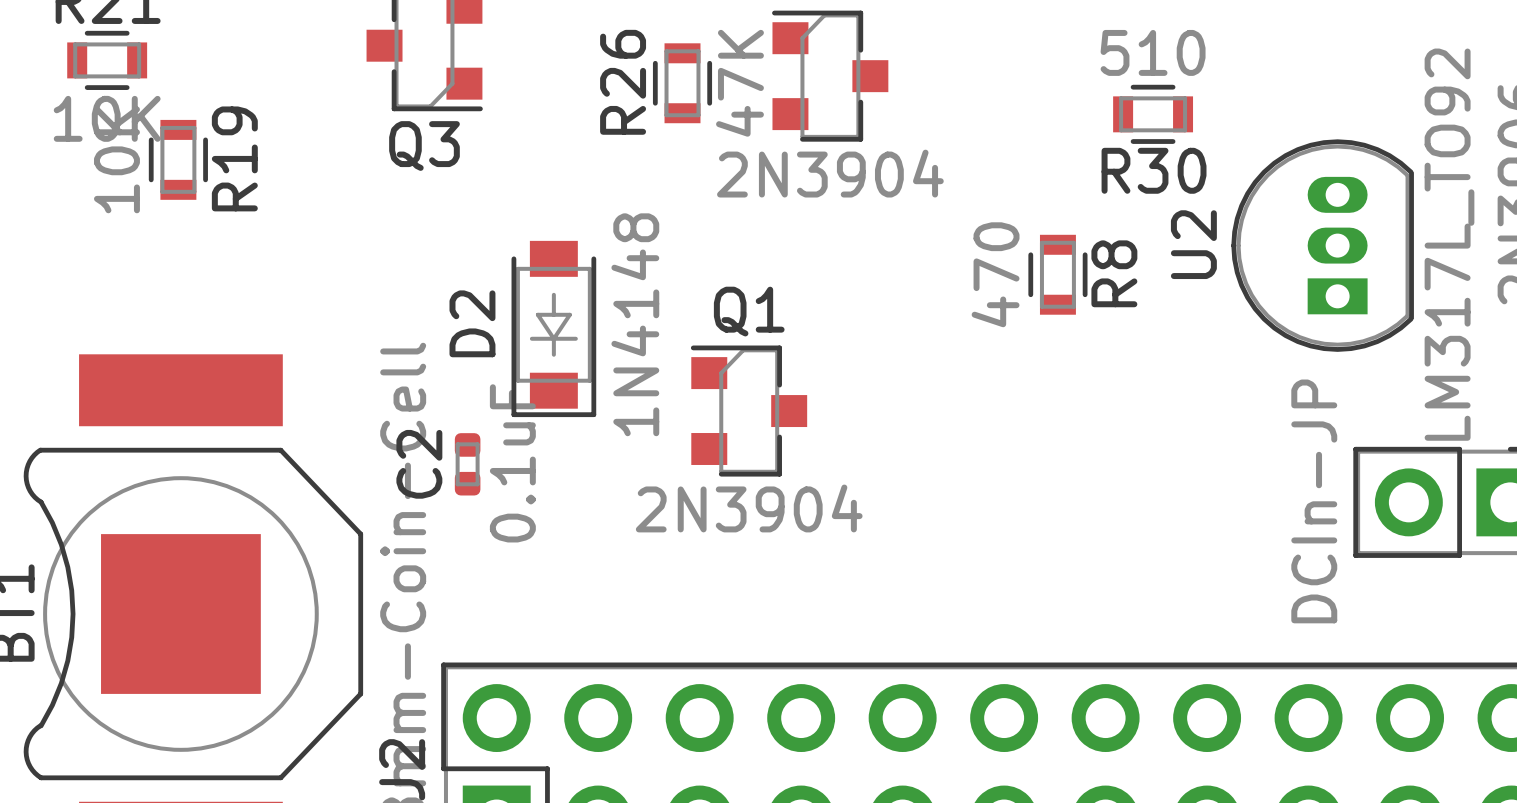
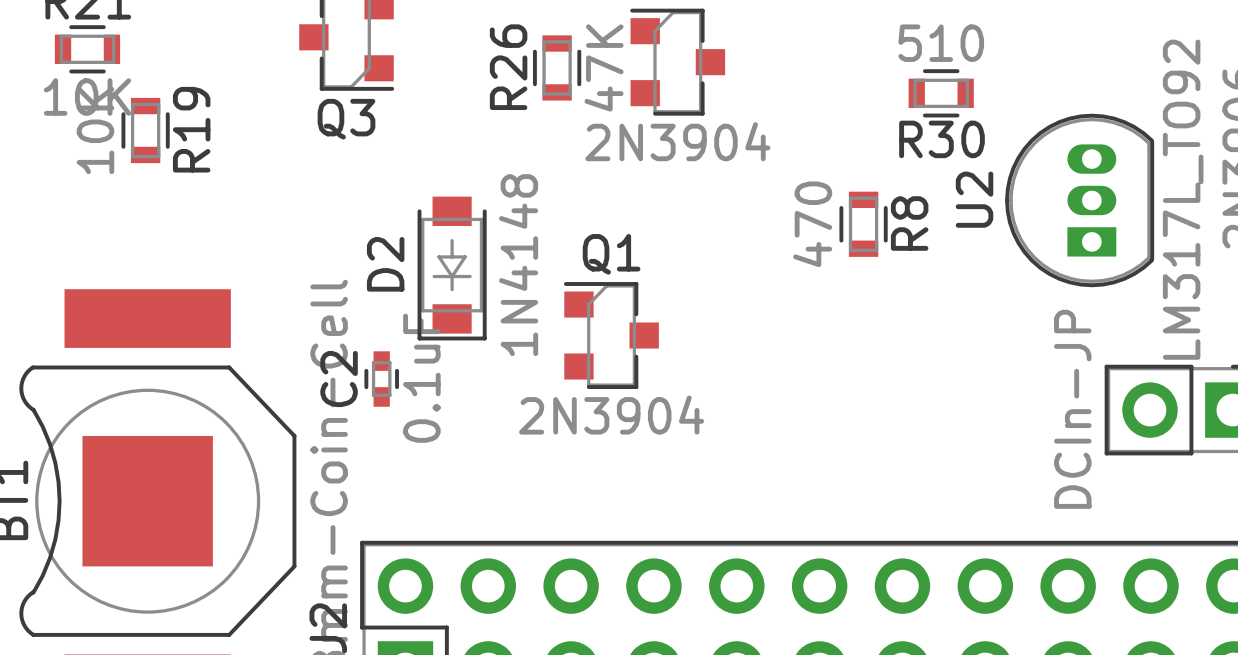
C2 footprint: [454, 433, 481, 496] -> [364, 351, 399, 407]

